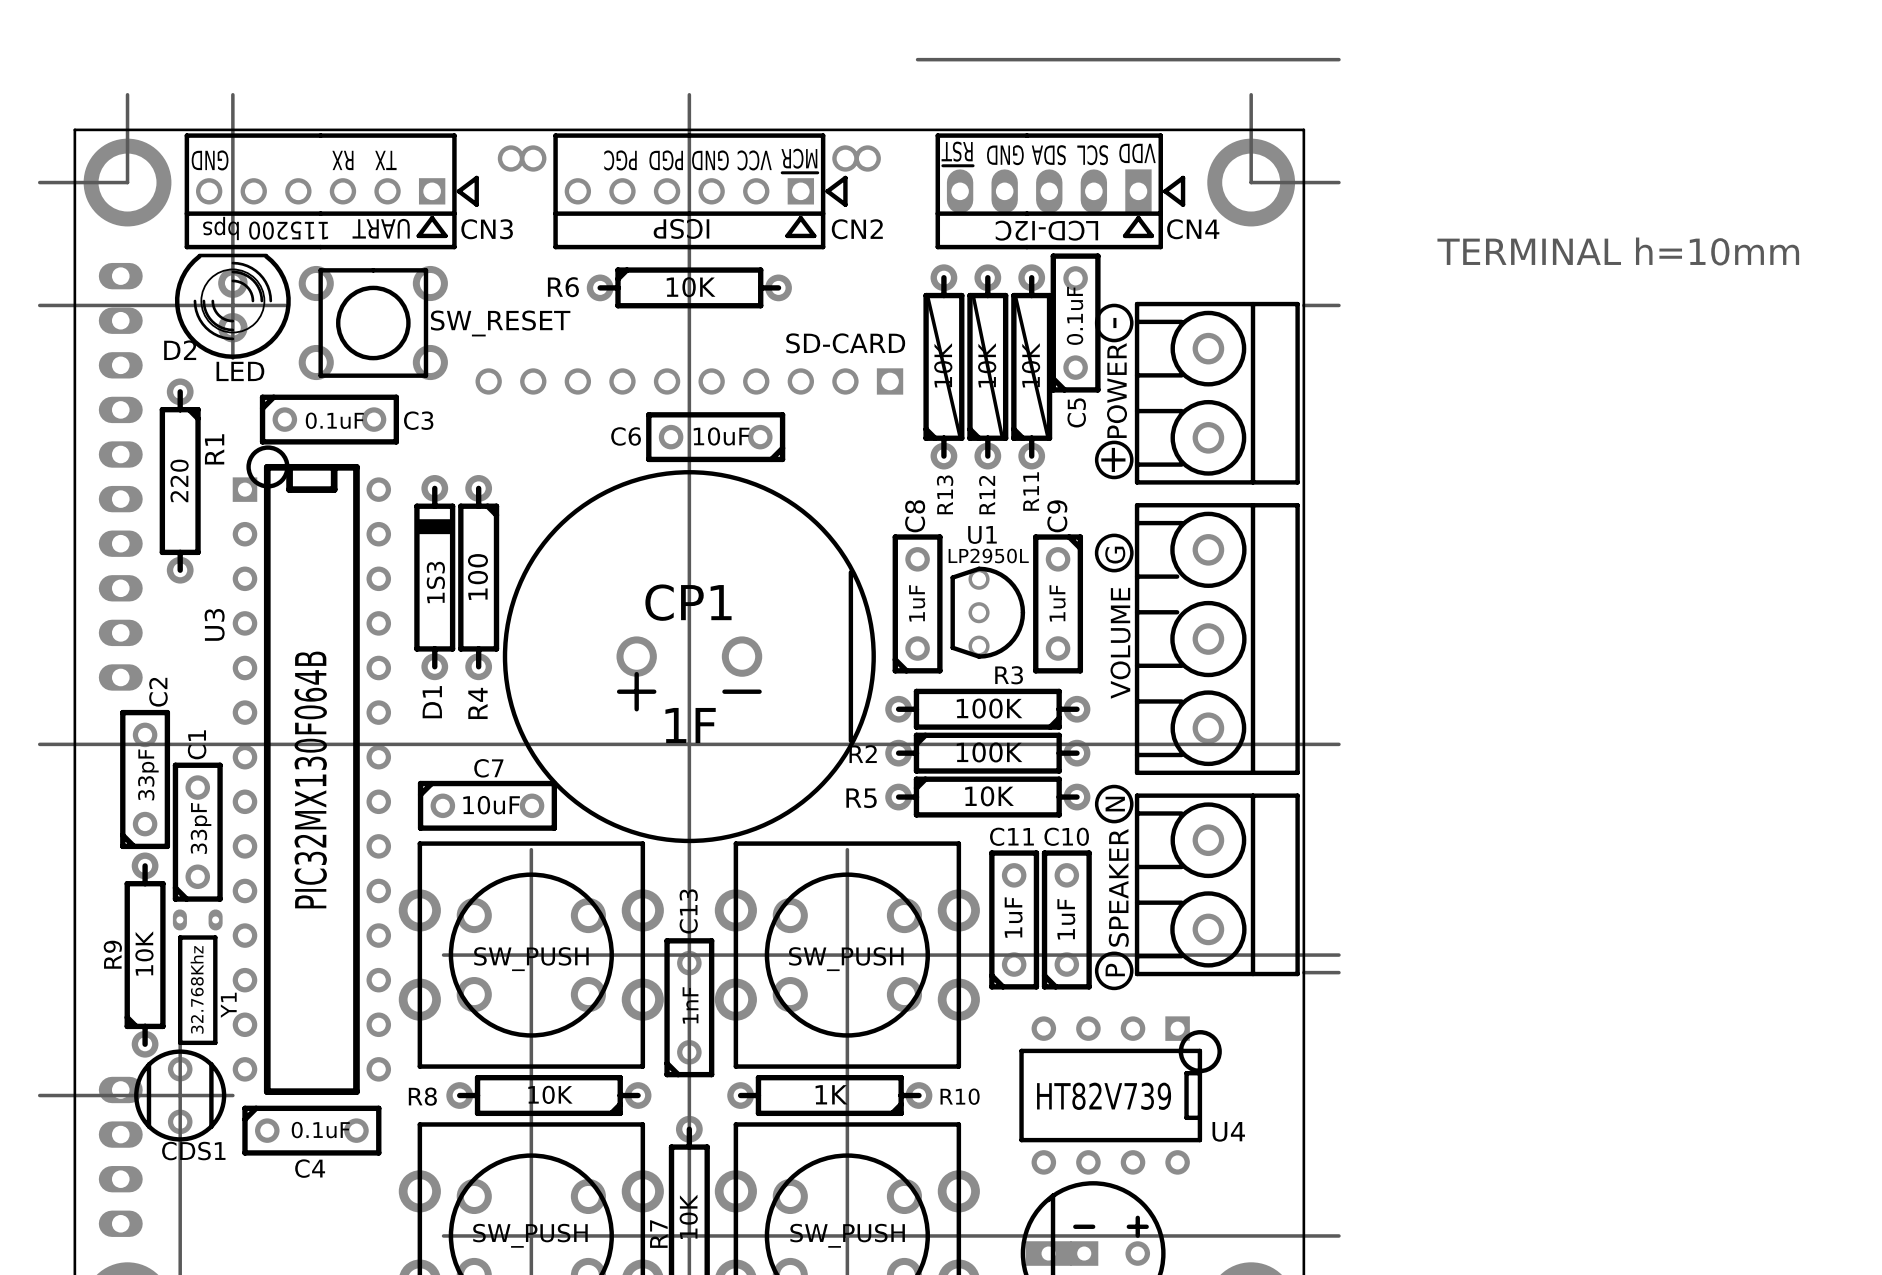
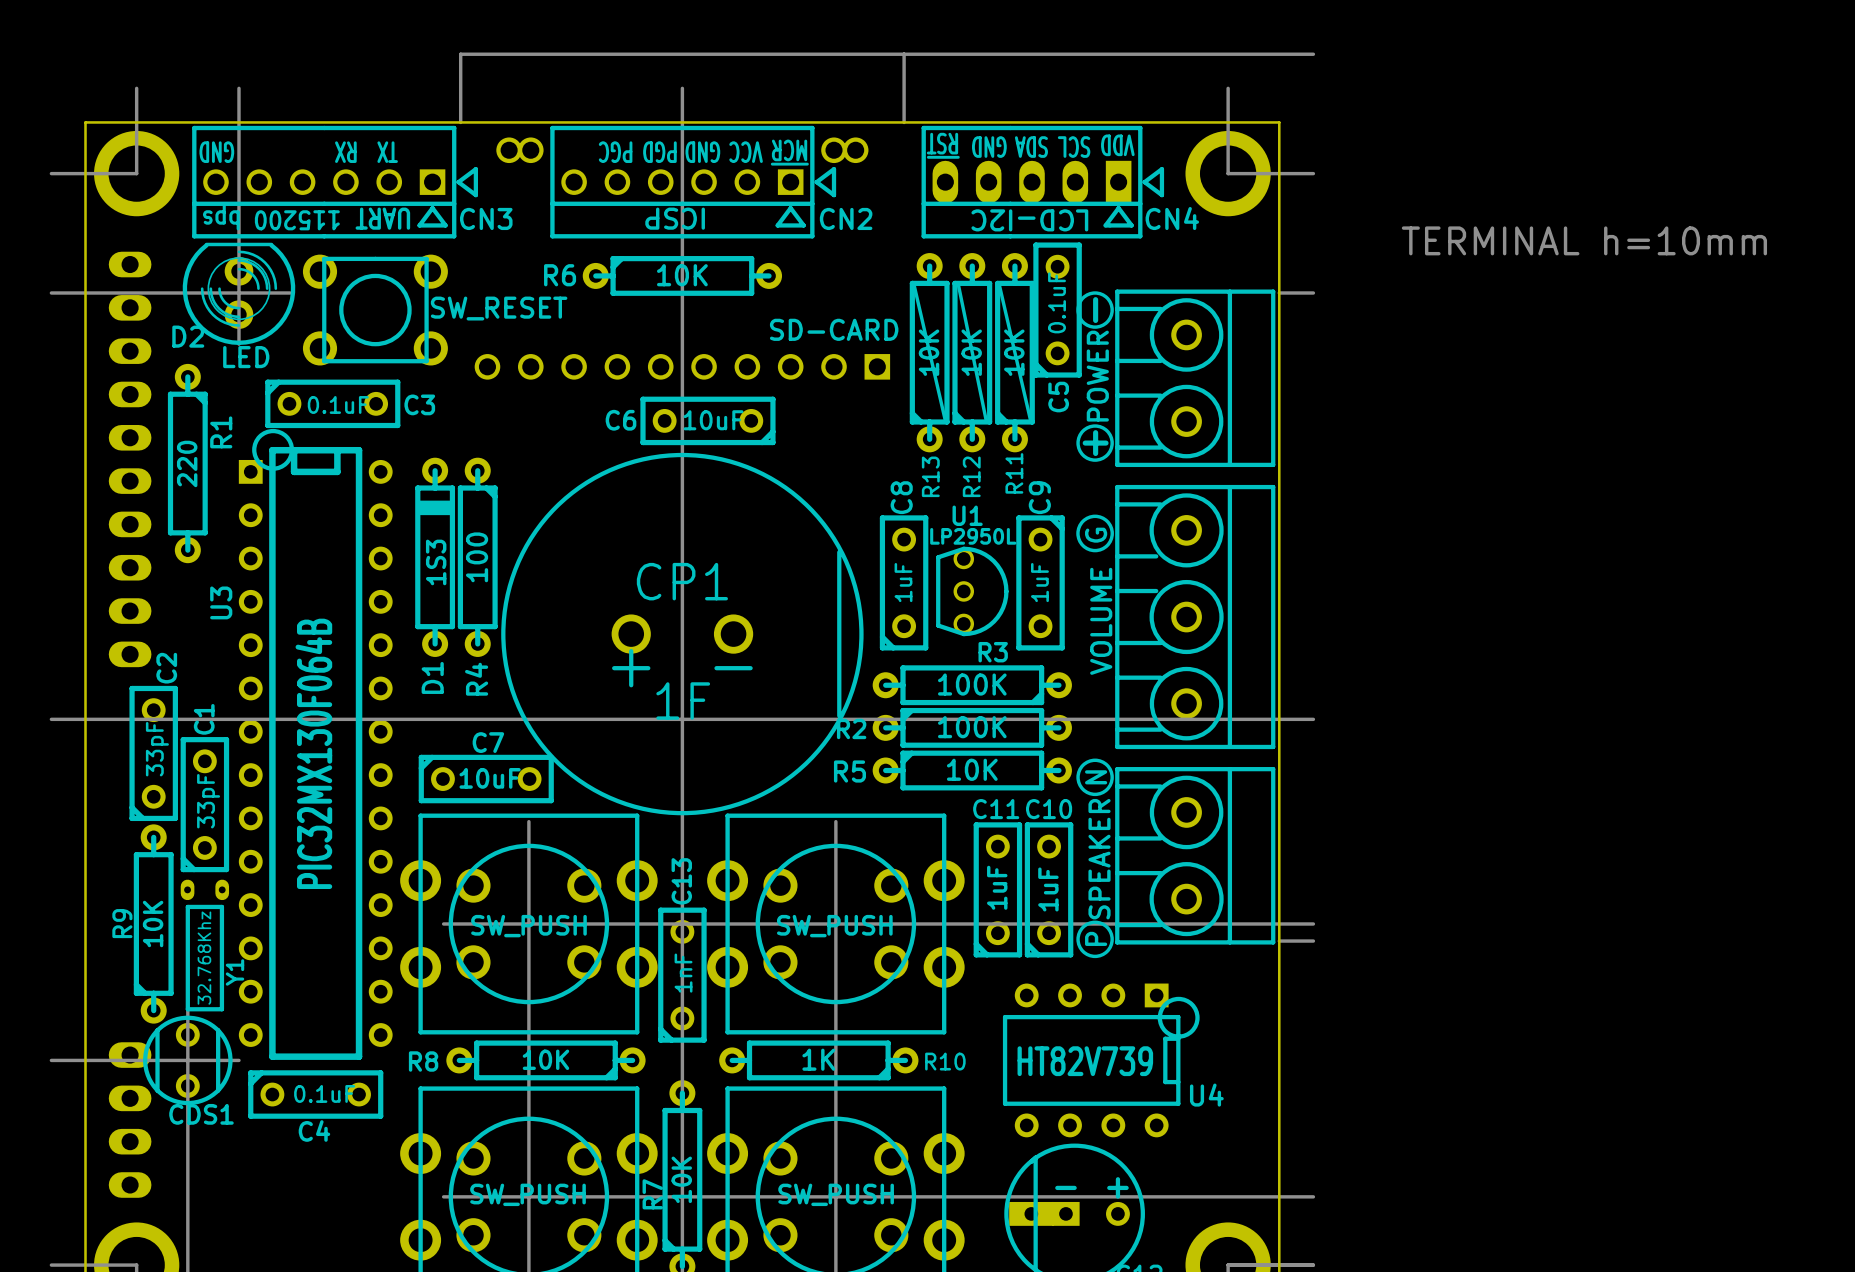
line: none -> (460, 122) (460, 54) (904, 54) (904, 122)

